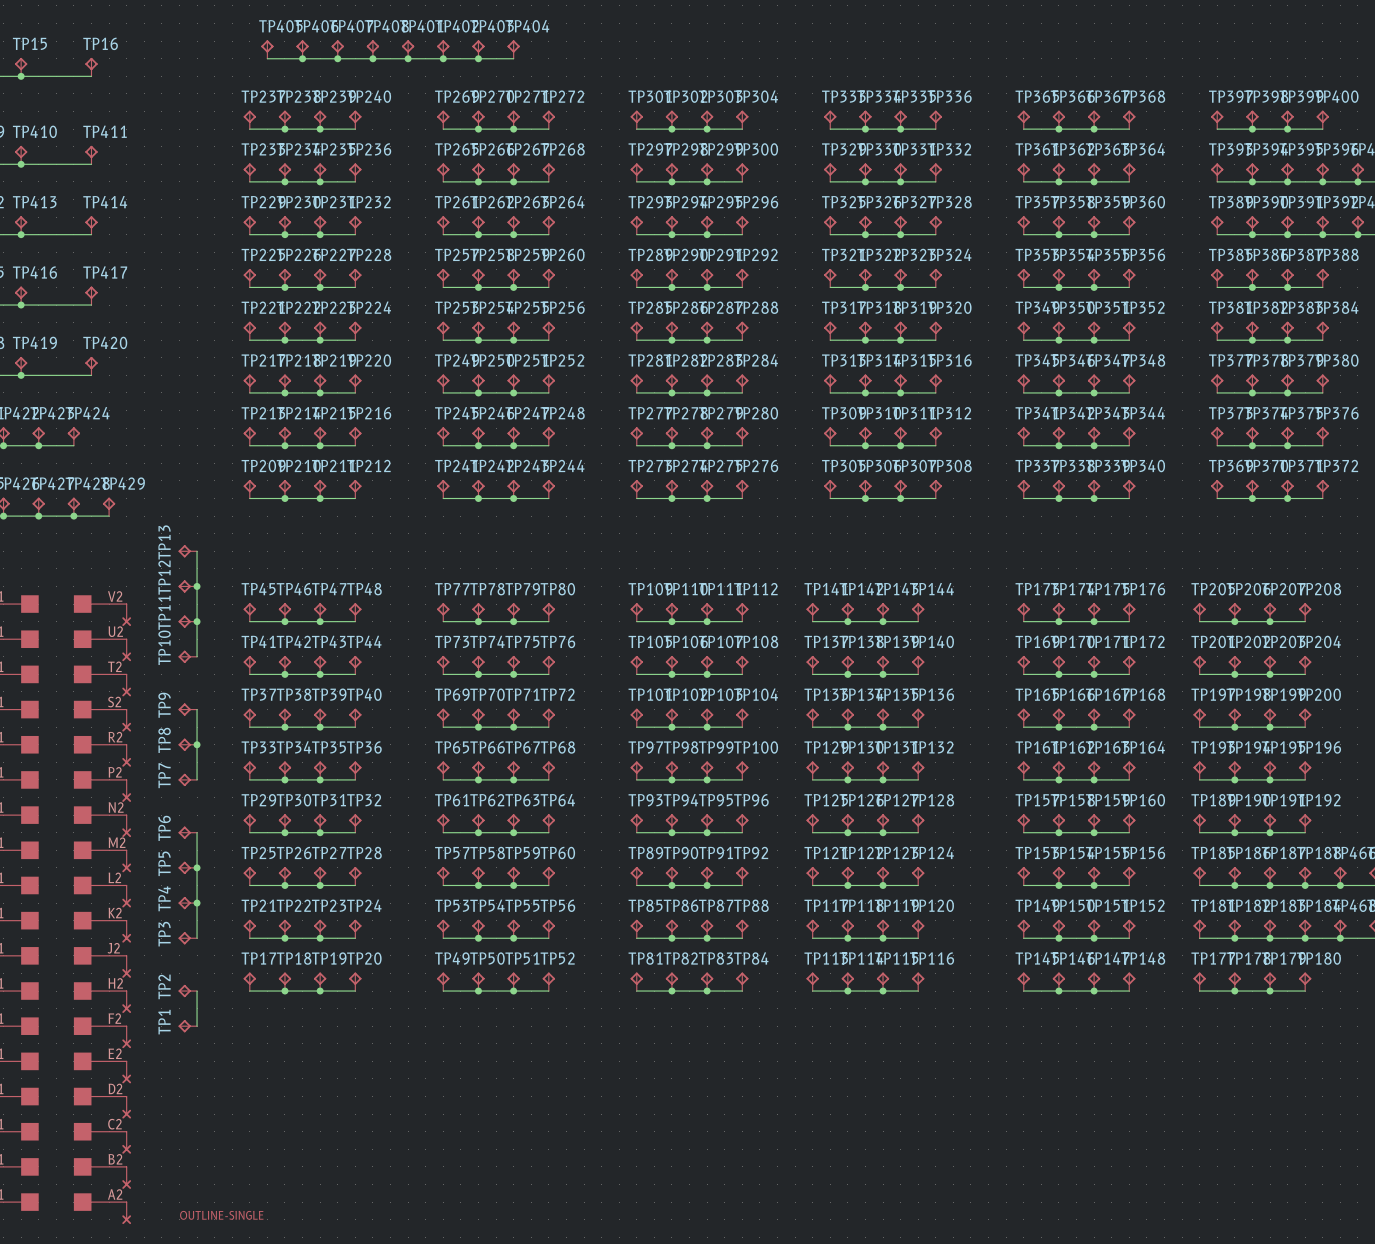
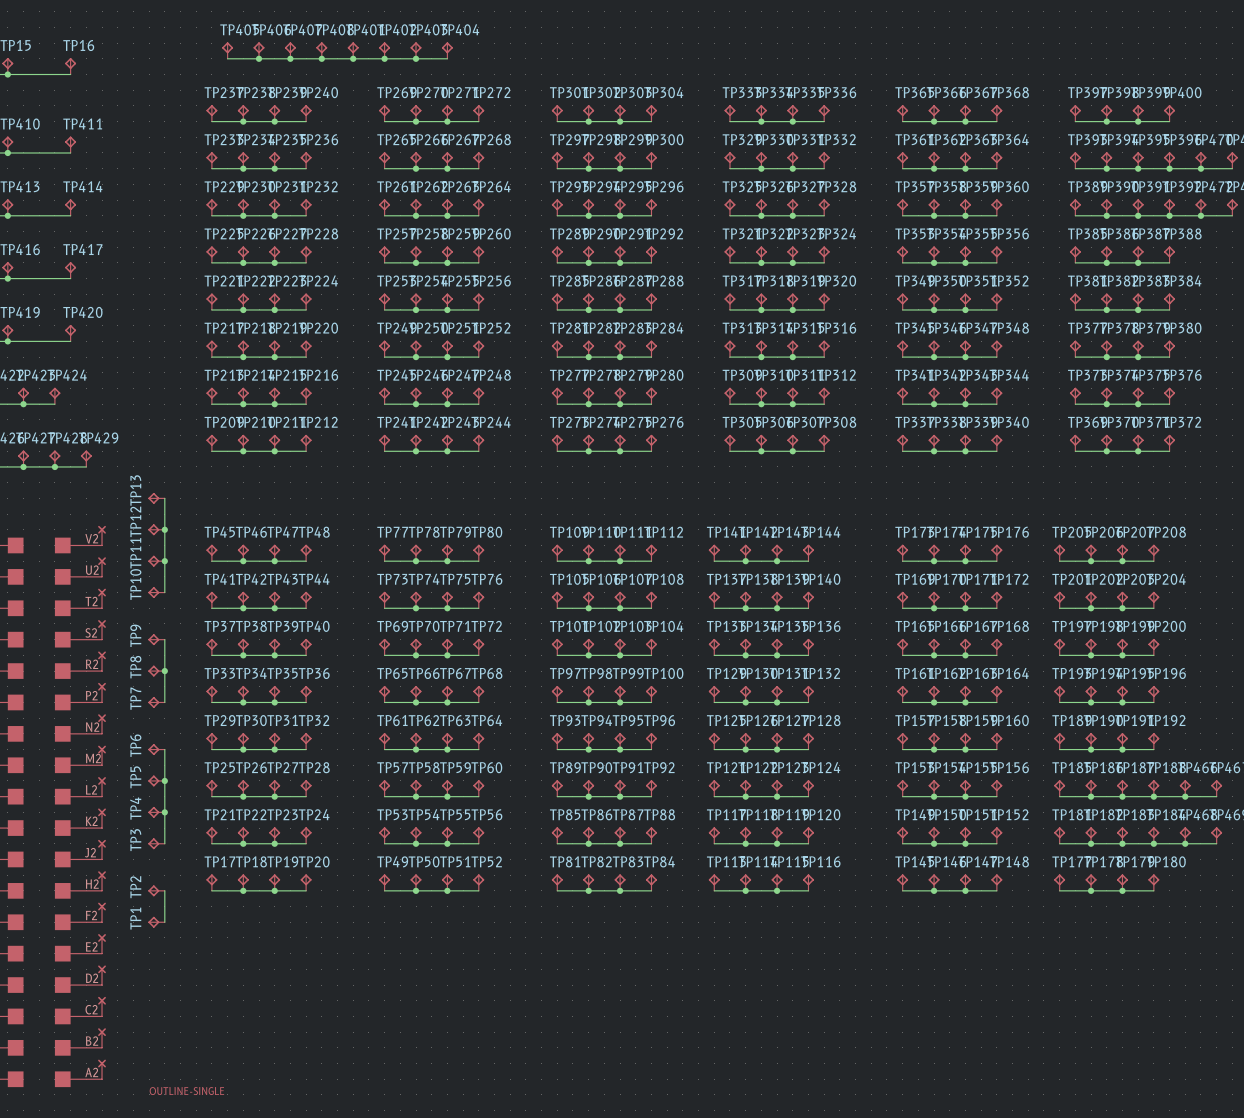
part: none -> (102, 535)
part: (126, 615) -> none
part: none -> (102, 567)
part: (126, 650) -> none
part: none -> (102, 598)
part: (126, 685) -> none
part: none -> (102, 629)
part: (126, 720) -> none
part: none -> (102, 661)
part: (126, 755) -> none
part: none -> (102, 692)
part: (126, 790) -> none
part: none -> (102, 724)
part: (126, 826) -> none
part: none -> (102, 755)
part: (126, 861) -> none
part: none -> (102, 786)
part: (126, 896) -> none
part: none -> (102, 818)
part: (126, 931) -> none
part: none -> (102, 849)
part: (126, 966) -> none
part: none -> (102, 881)
part: (126, 1002) -> none
part: none -> (102, 912)
part: (126, 1037) -> none
part: none -> (102, 943)
part: (126, 1072) -> none
part: none -> (102, 975)
part: (126, 1107) -> none
part: none -> (102, 1006)
part: (126, 1142) -> none
part: none -> (102, 1038)
part: (126, 1177) -> none
part: none -> (102, 1069)
part: (126, 1213) -> none

